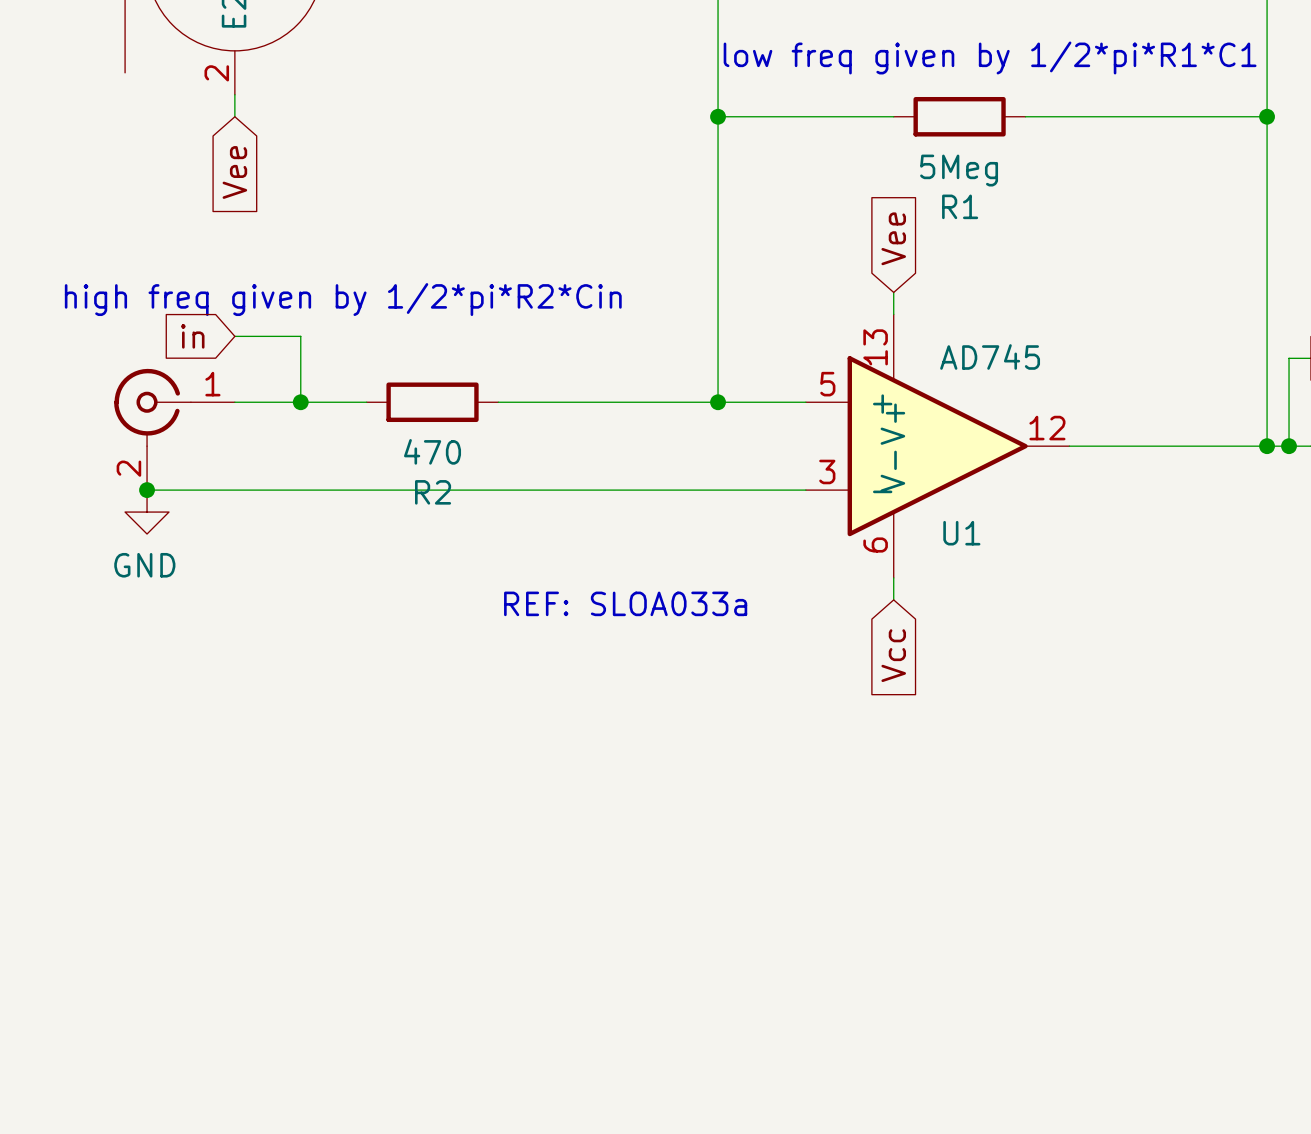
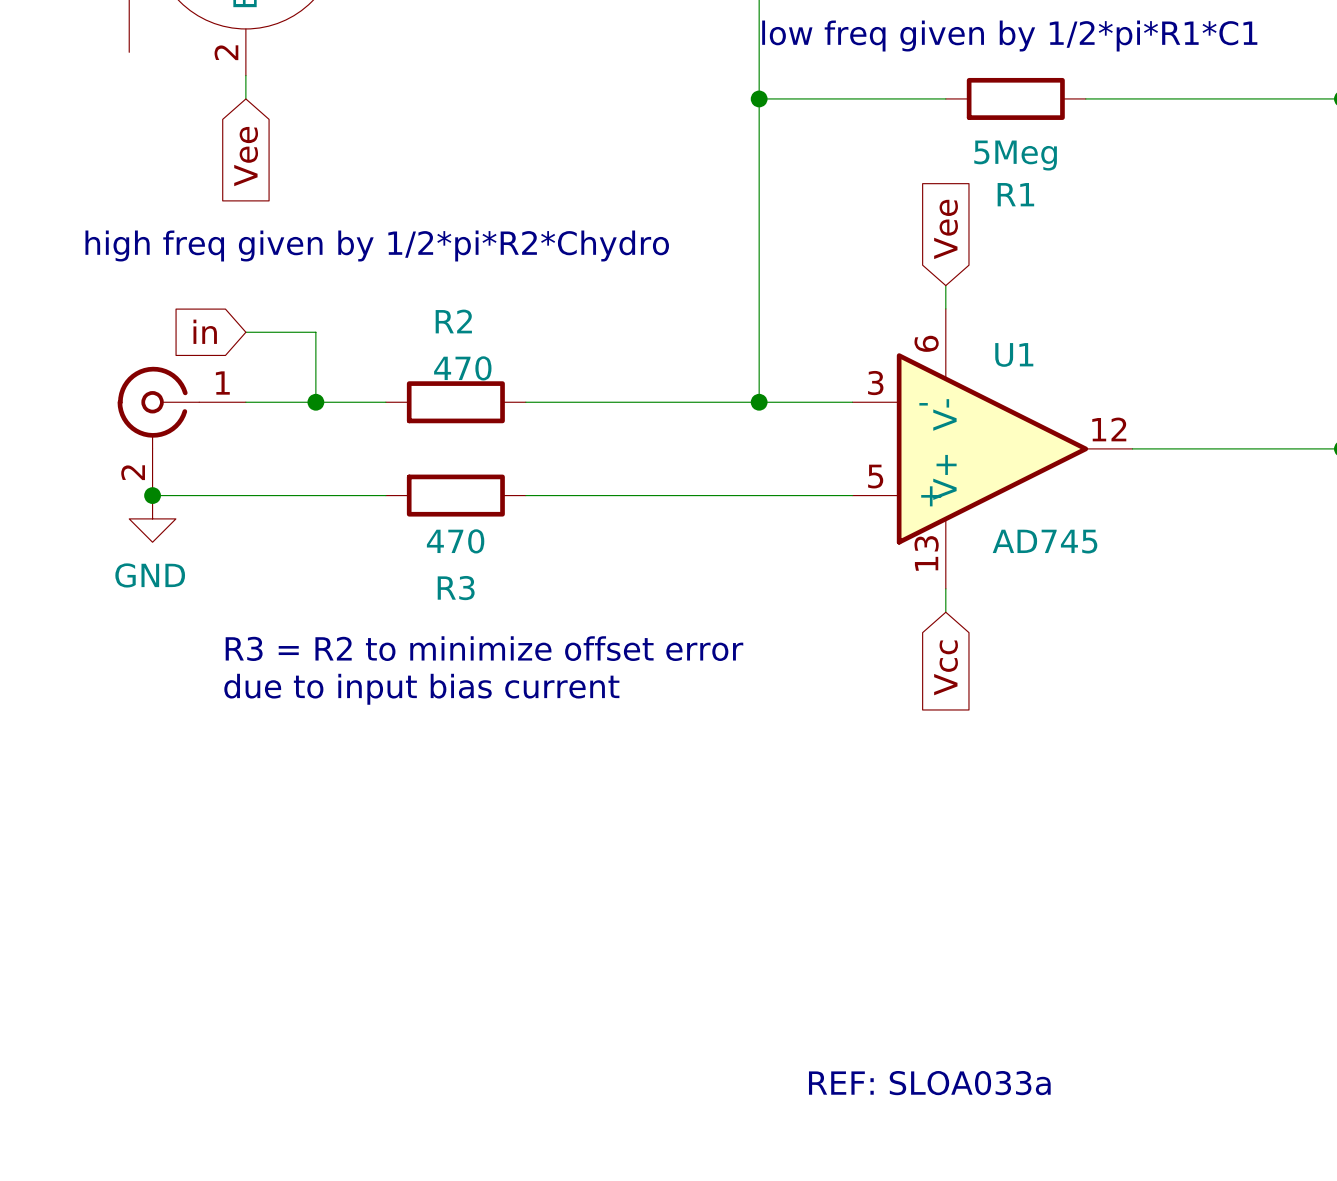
text: high freq given by 1/2*pi*R2*Cin (343, 299) -> high freq given by 1/2*pi*R2*Chydro (377, 245)
U1 flip: as is (937, 446) -> up-down (992, 448)
R2 value position: 470 (432, 451) -> 470 (462, 368)
wire: (366, 490) (498, 490) -> none
R3: none -> 470 (455, 495)
R2 name position: R2 (433, 492) -> R2 (453, 321)
text: REF: SLOA033a (625, 603) -> none
text: none -> R3 = R2 to minimize offset error (484, 648)
text: none -> due to input bias current (421, 689)
text: none -> REF: SLOA033a (929, 1083)

